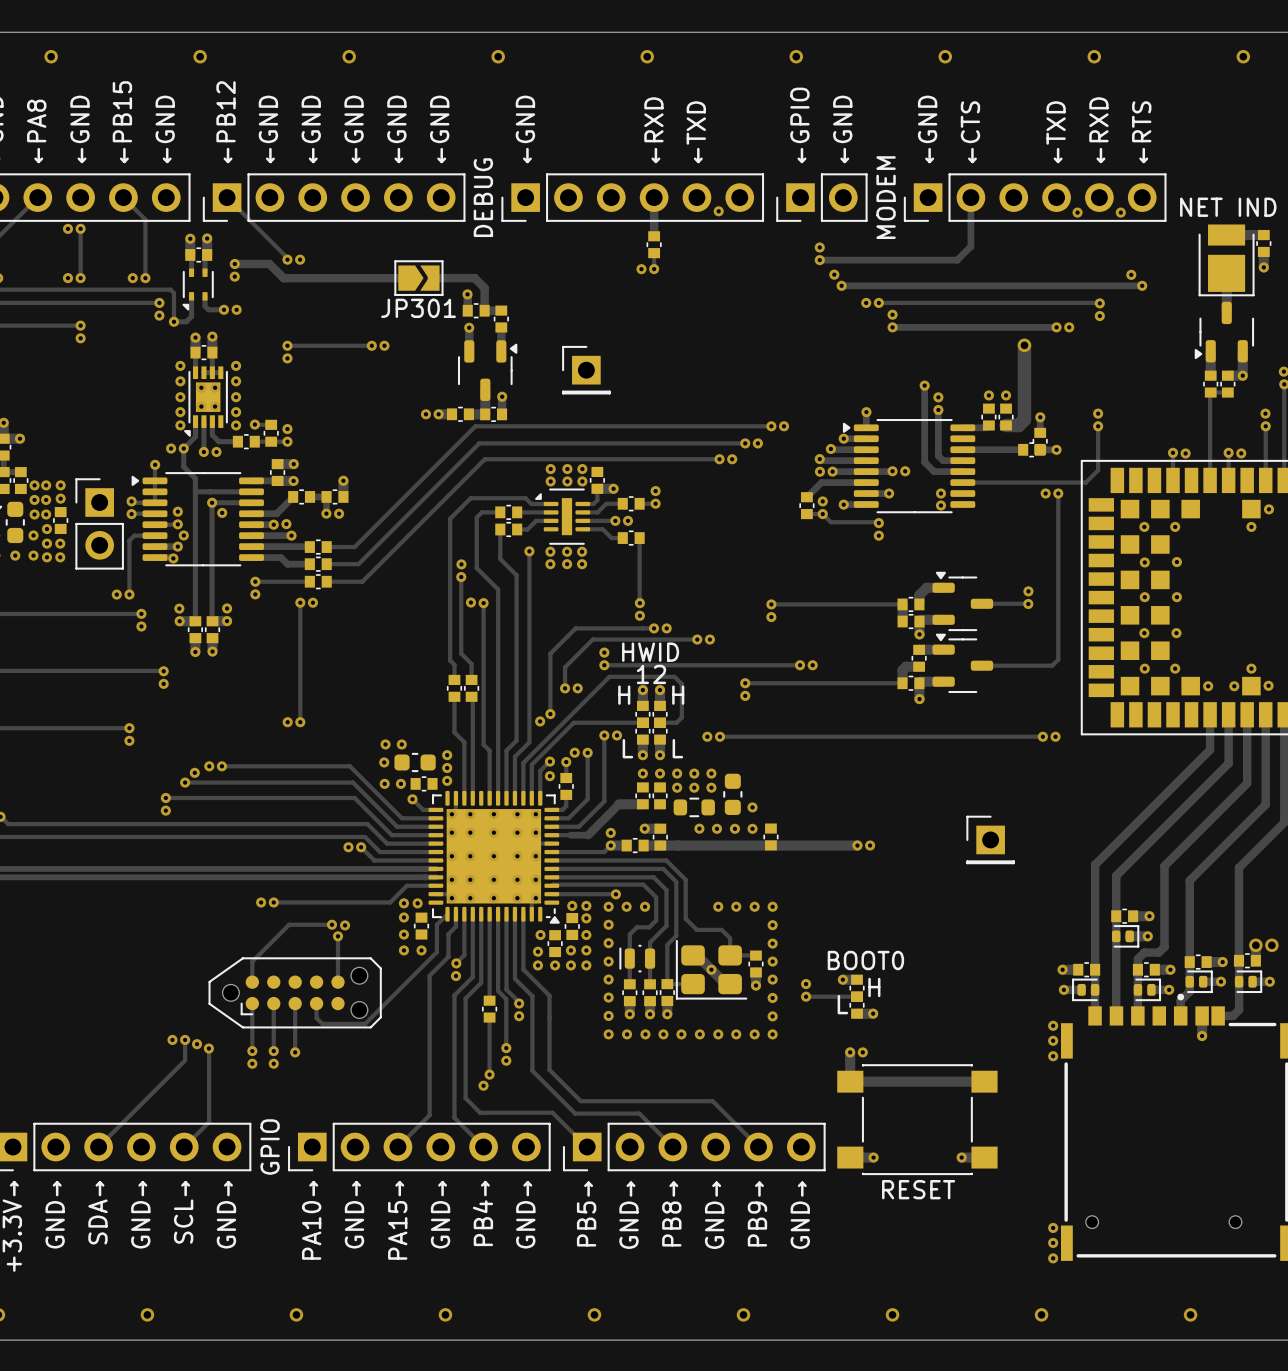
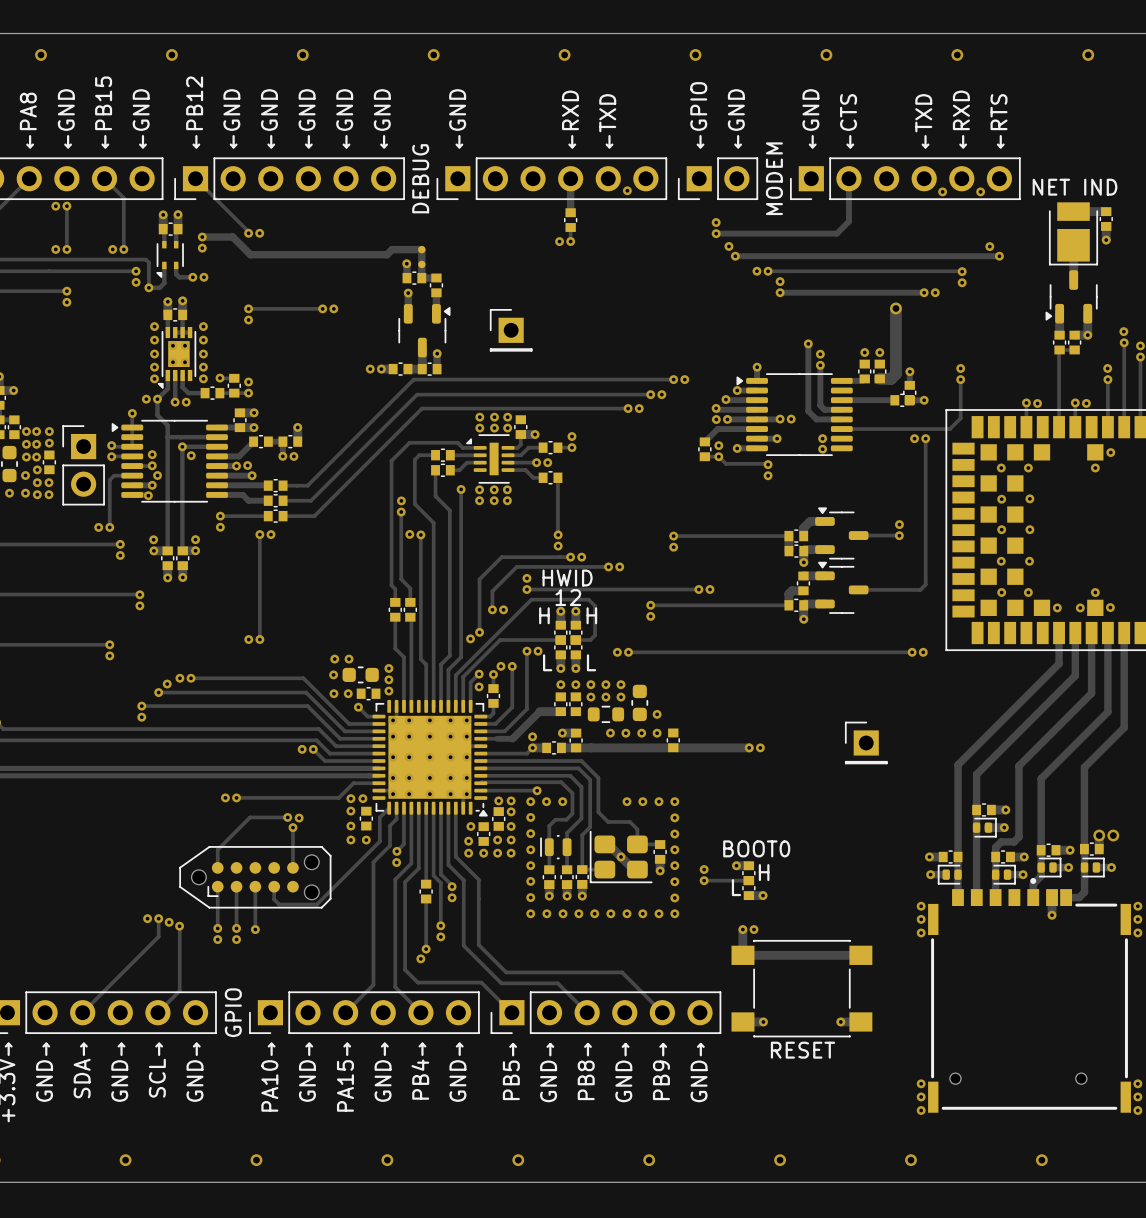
track: (283, 278) (406, 278) -> (245, 249) (250, 254) (387, 254) (392, 249) (421, 249)
JP301: (418, 278) -> none
track: (431, 278) (474, 278) (484, 288) (484, 295) -> none
part: none -> (421, 257)

